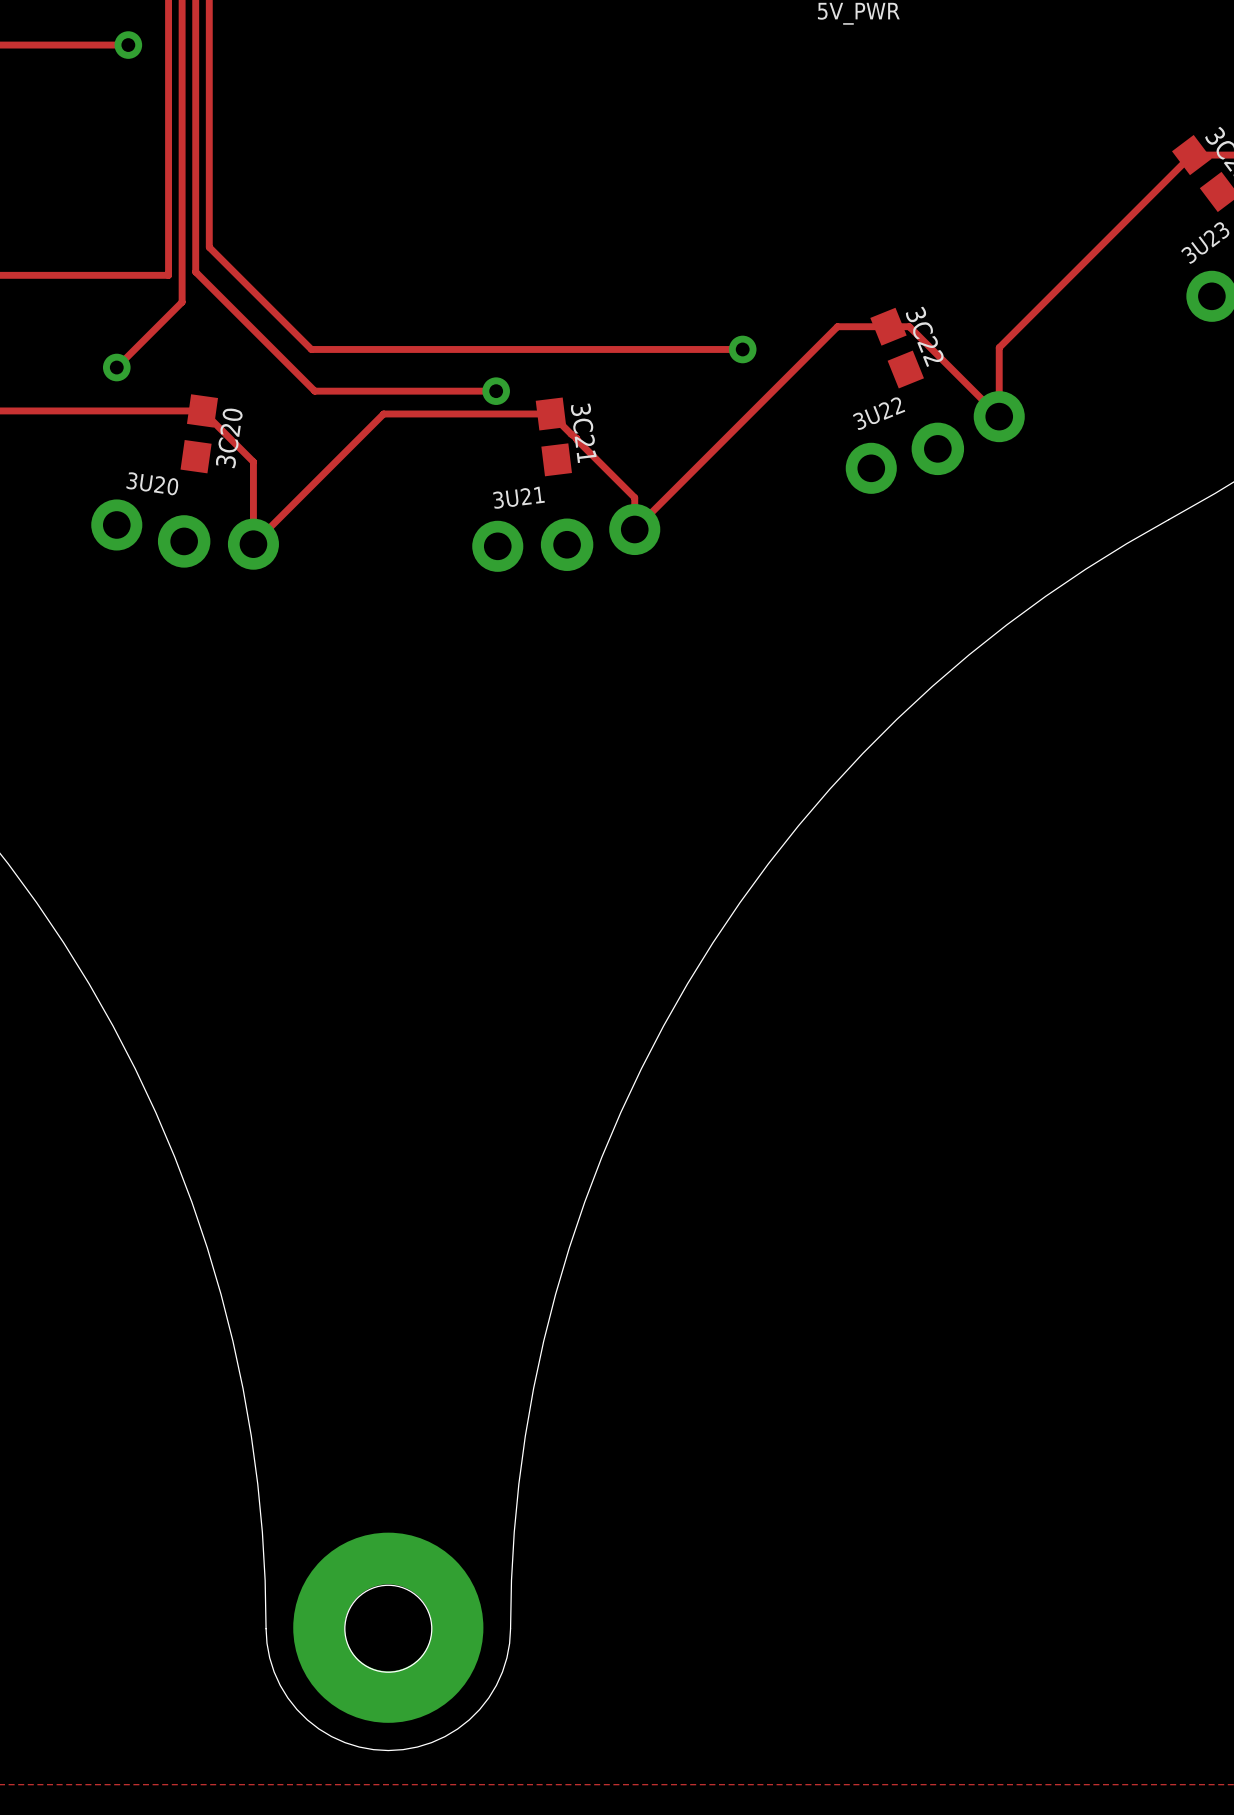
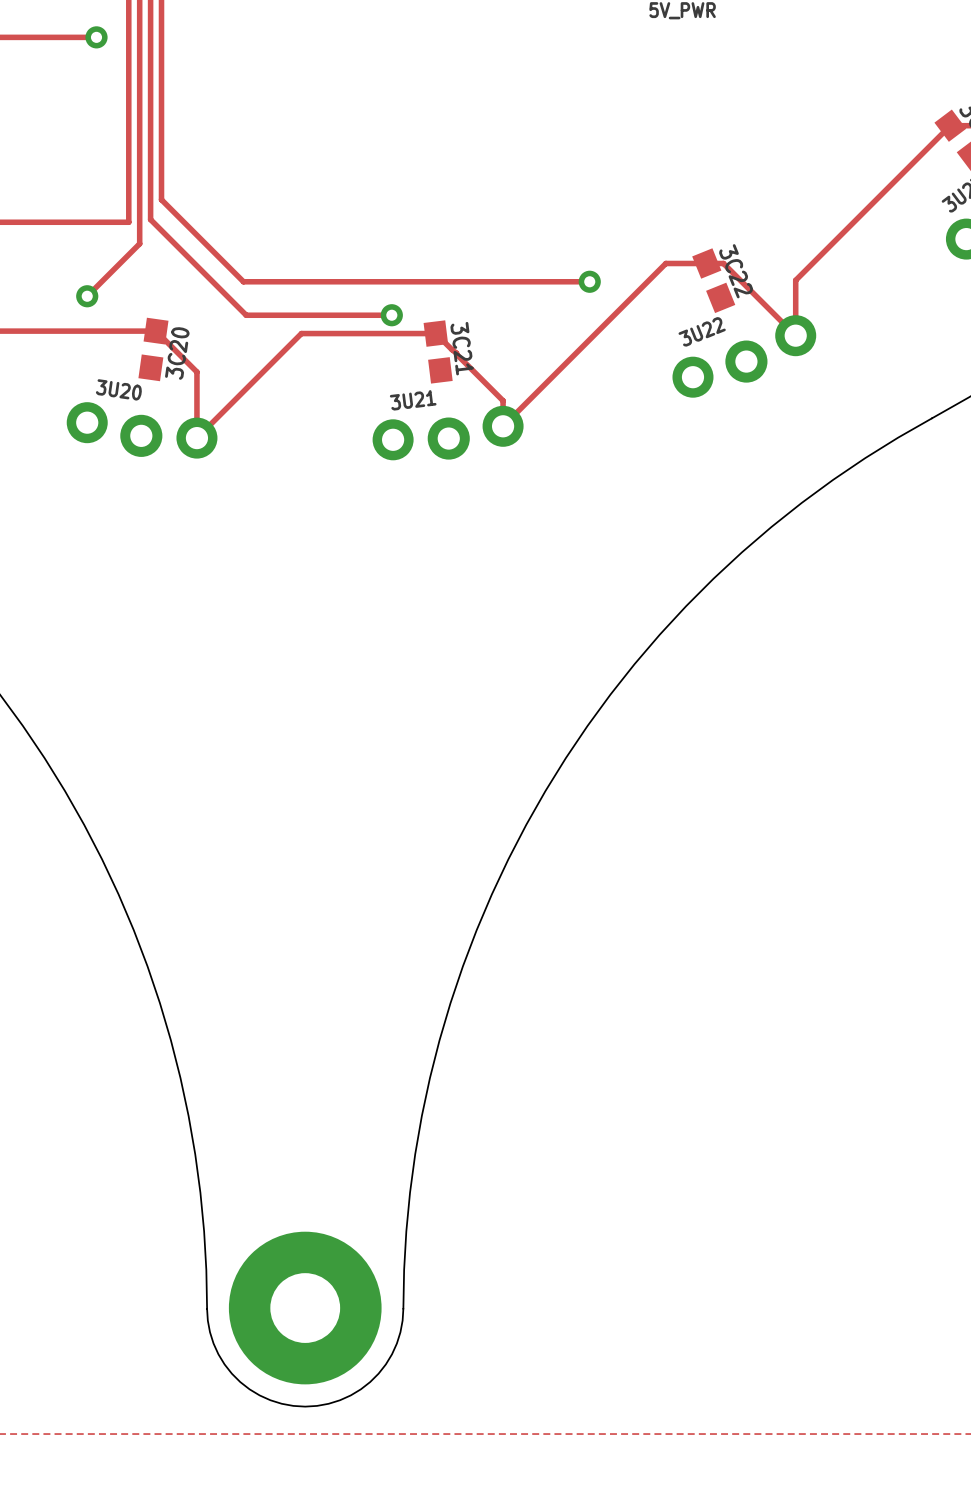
round board edge: [344, 1585, 432, 1673] -> none

